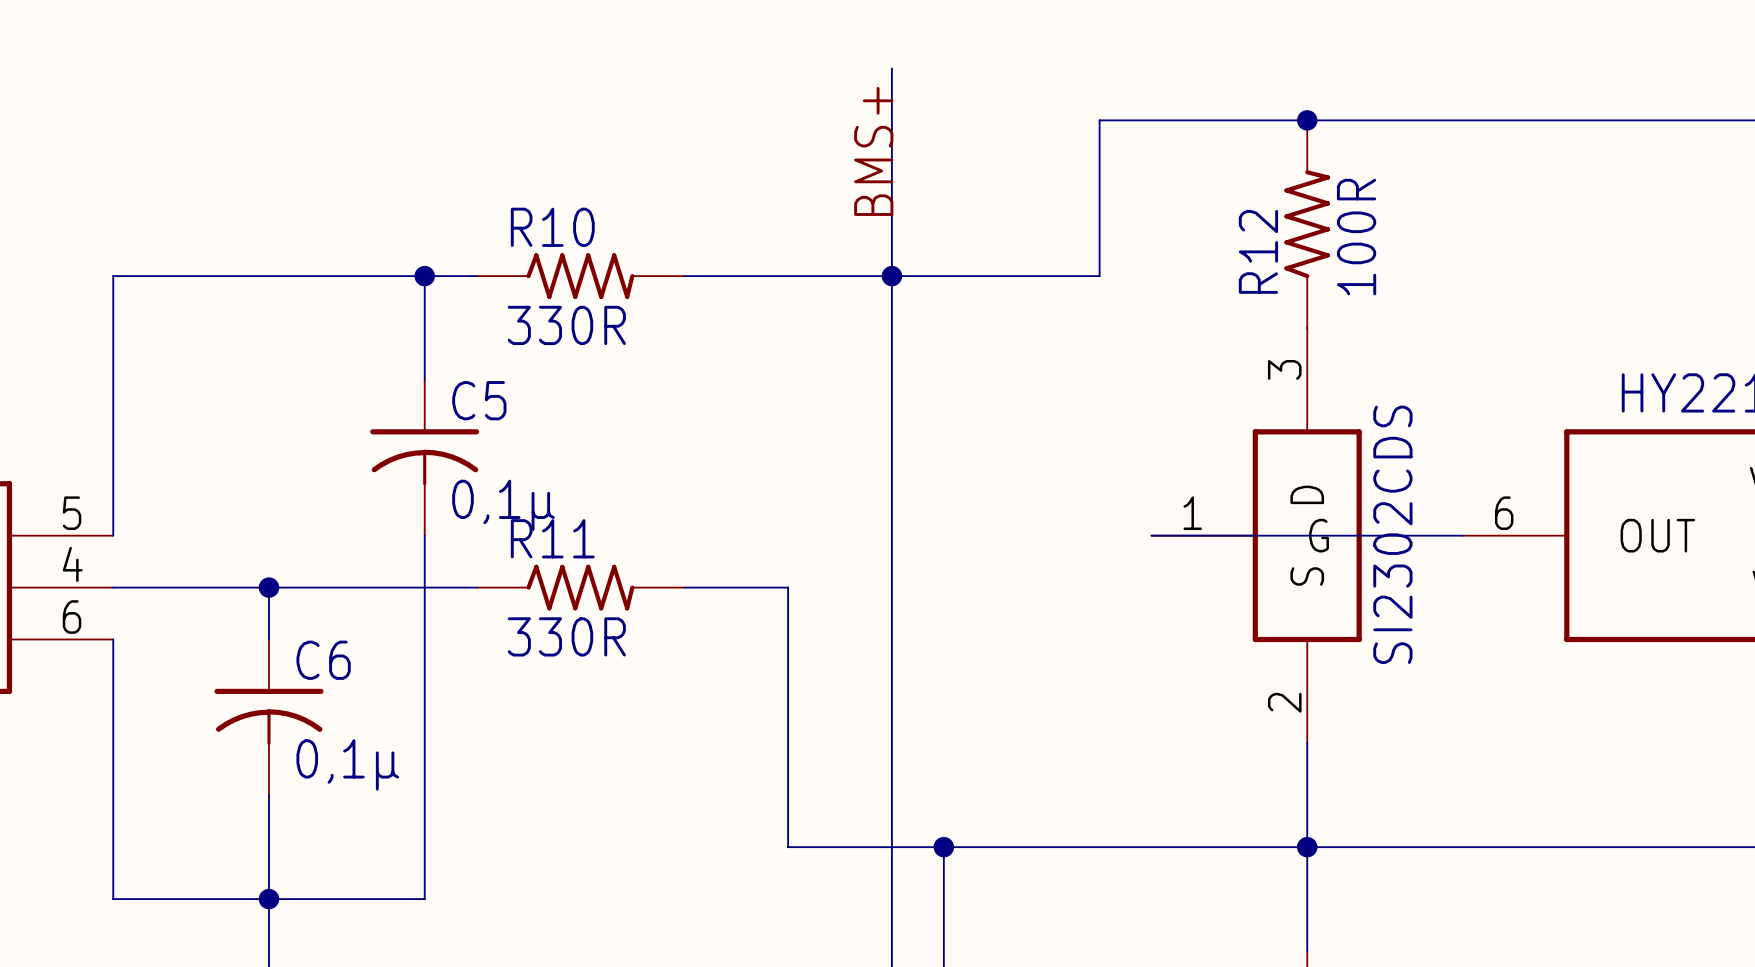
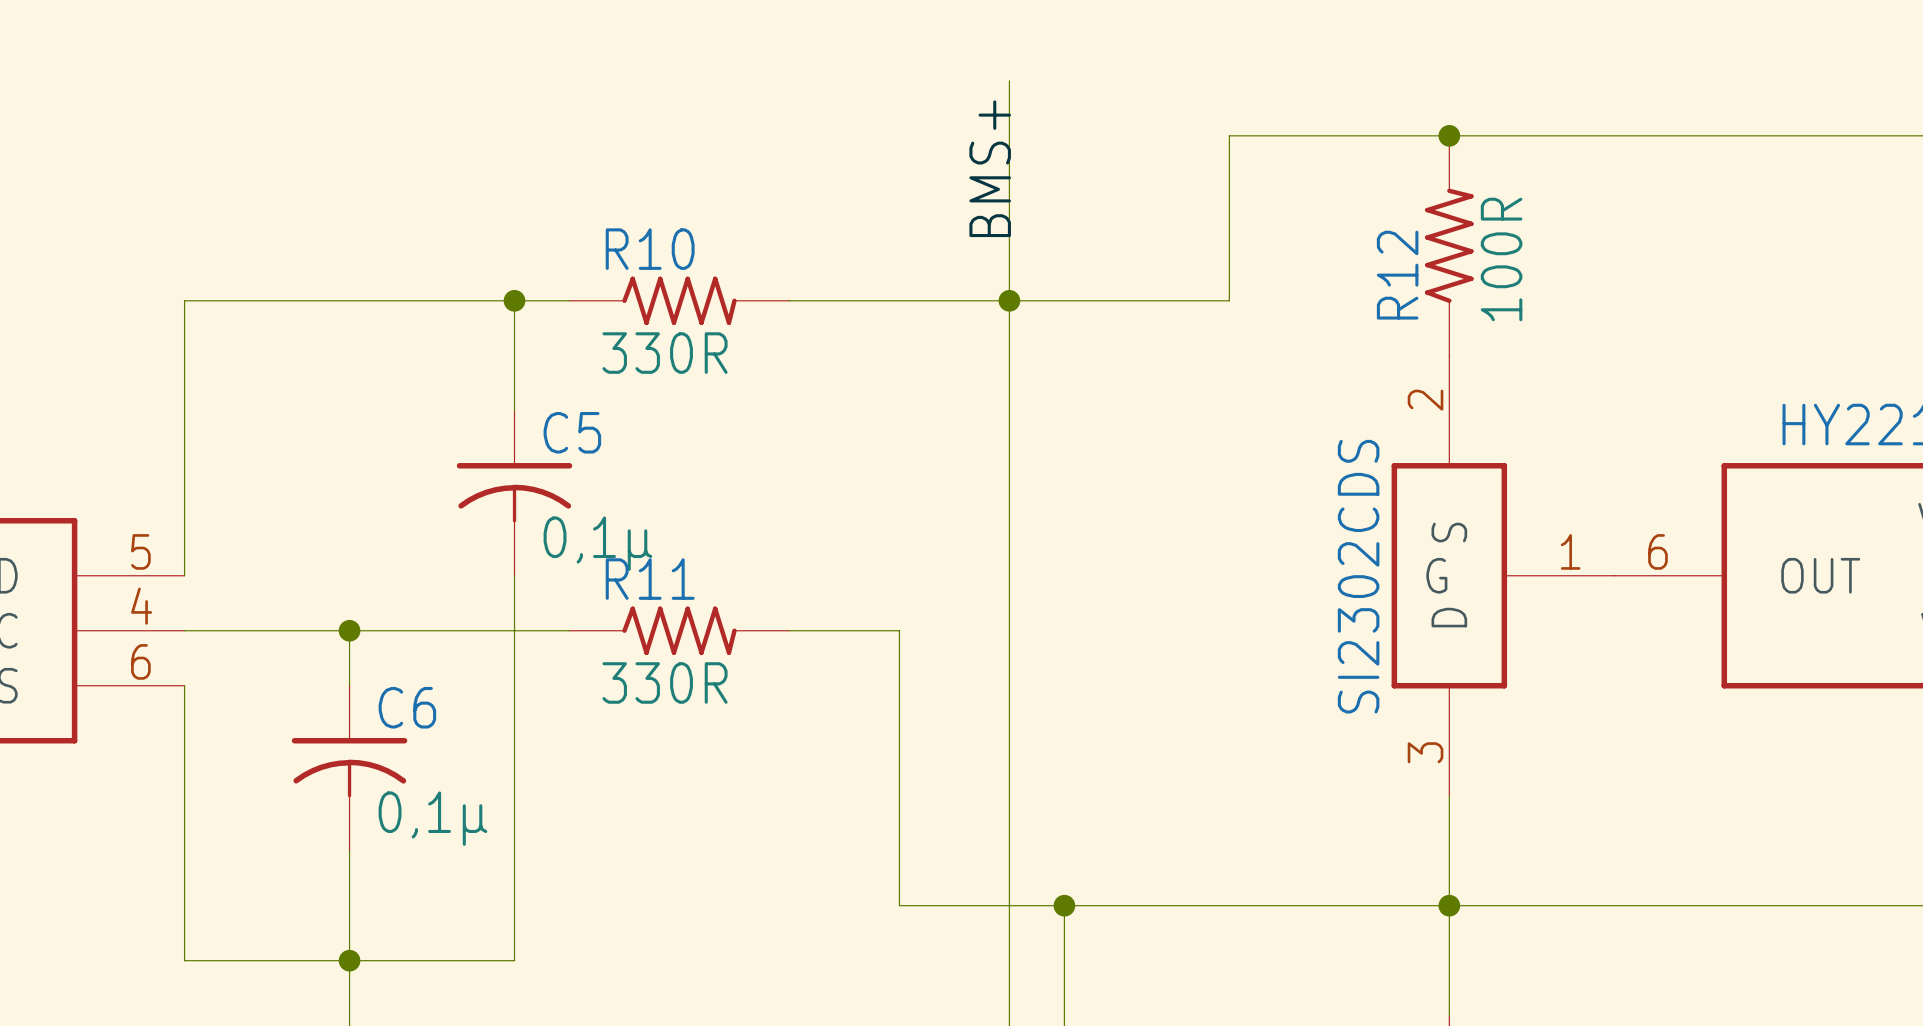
wire: (1151, 535) (1462, 535) -> none
part: (1256, 535) -> none
part: none -> (1502, 575)

